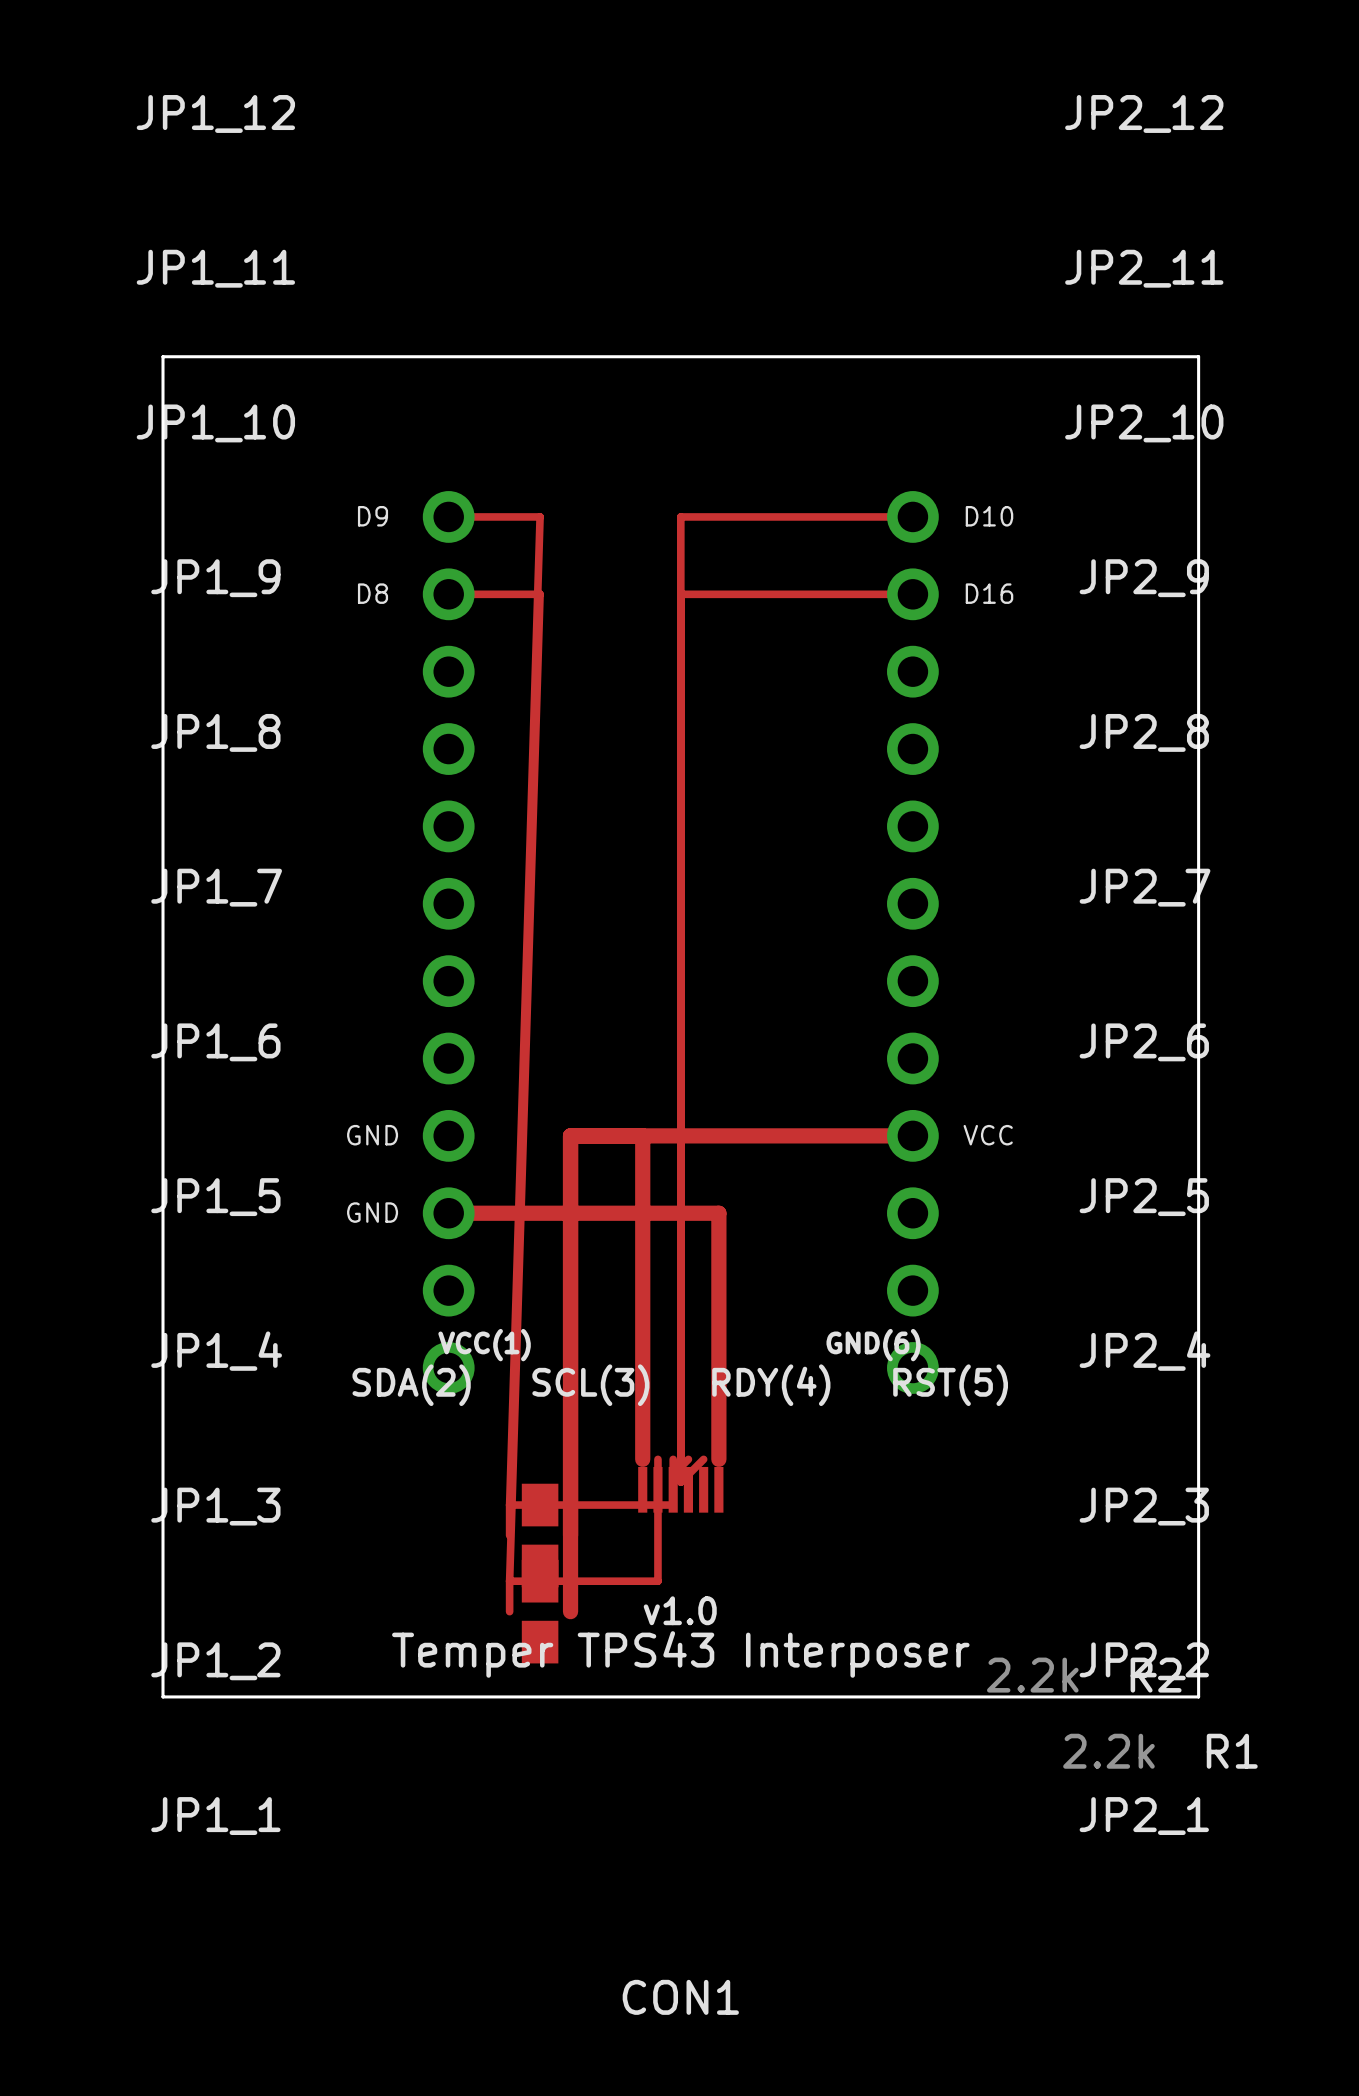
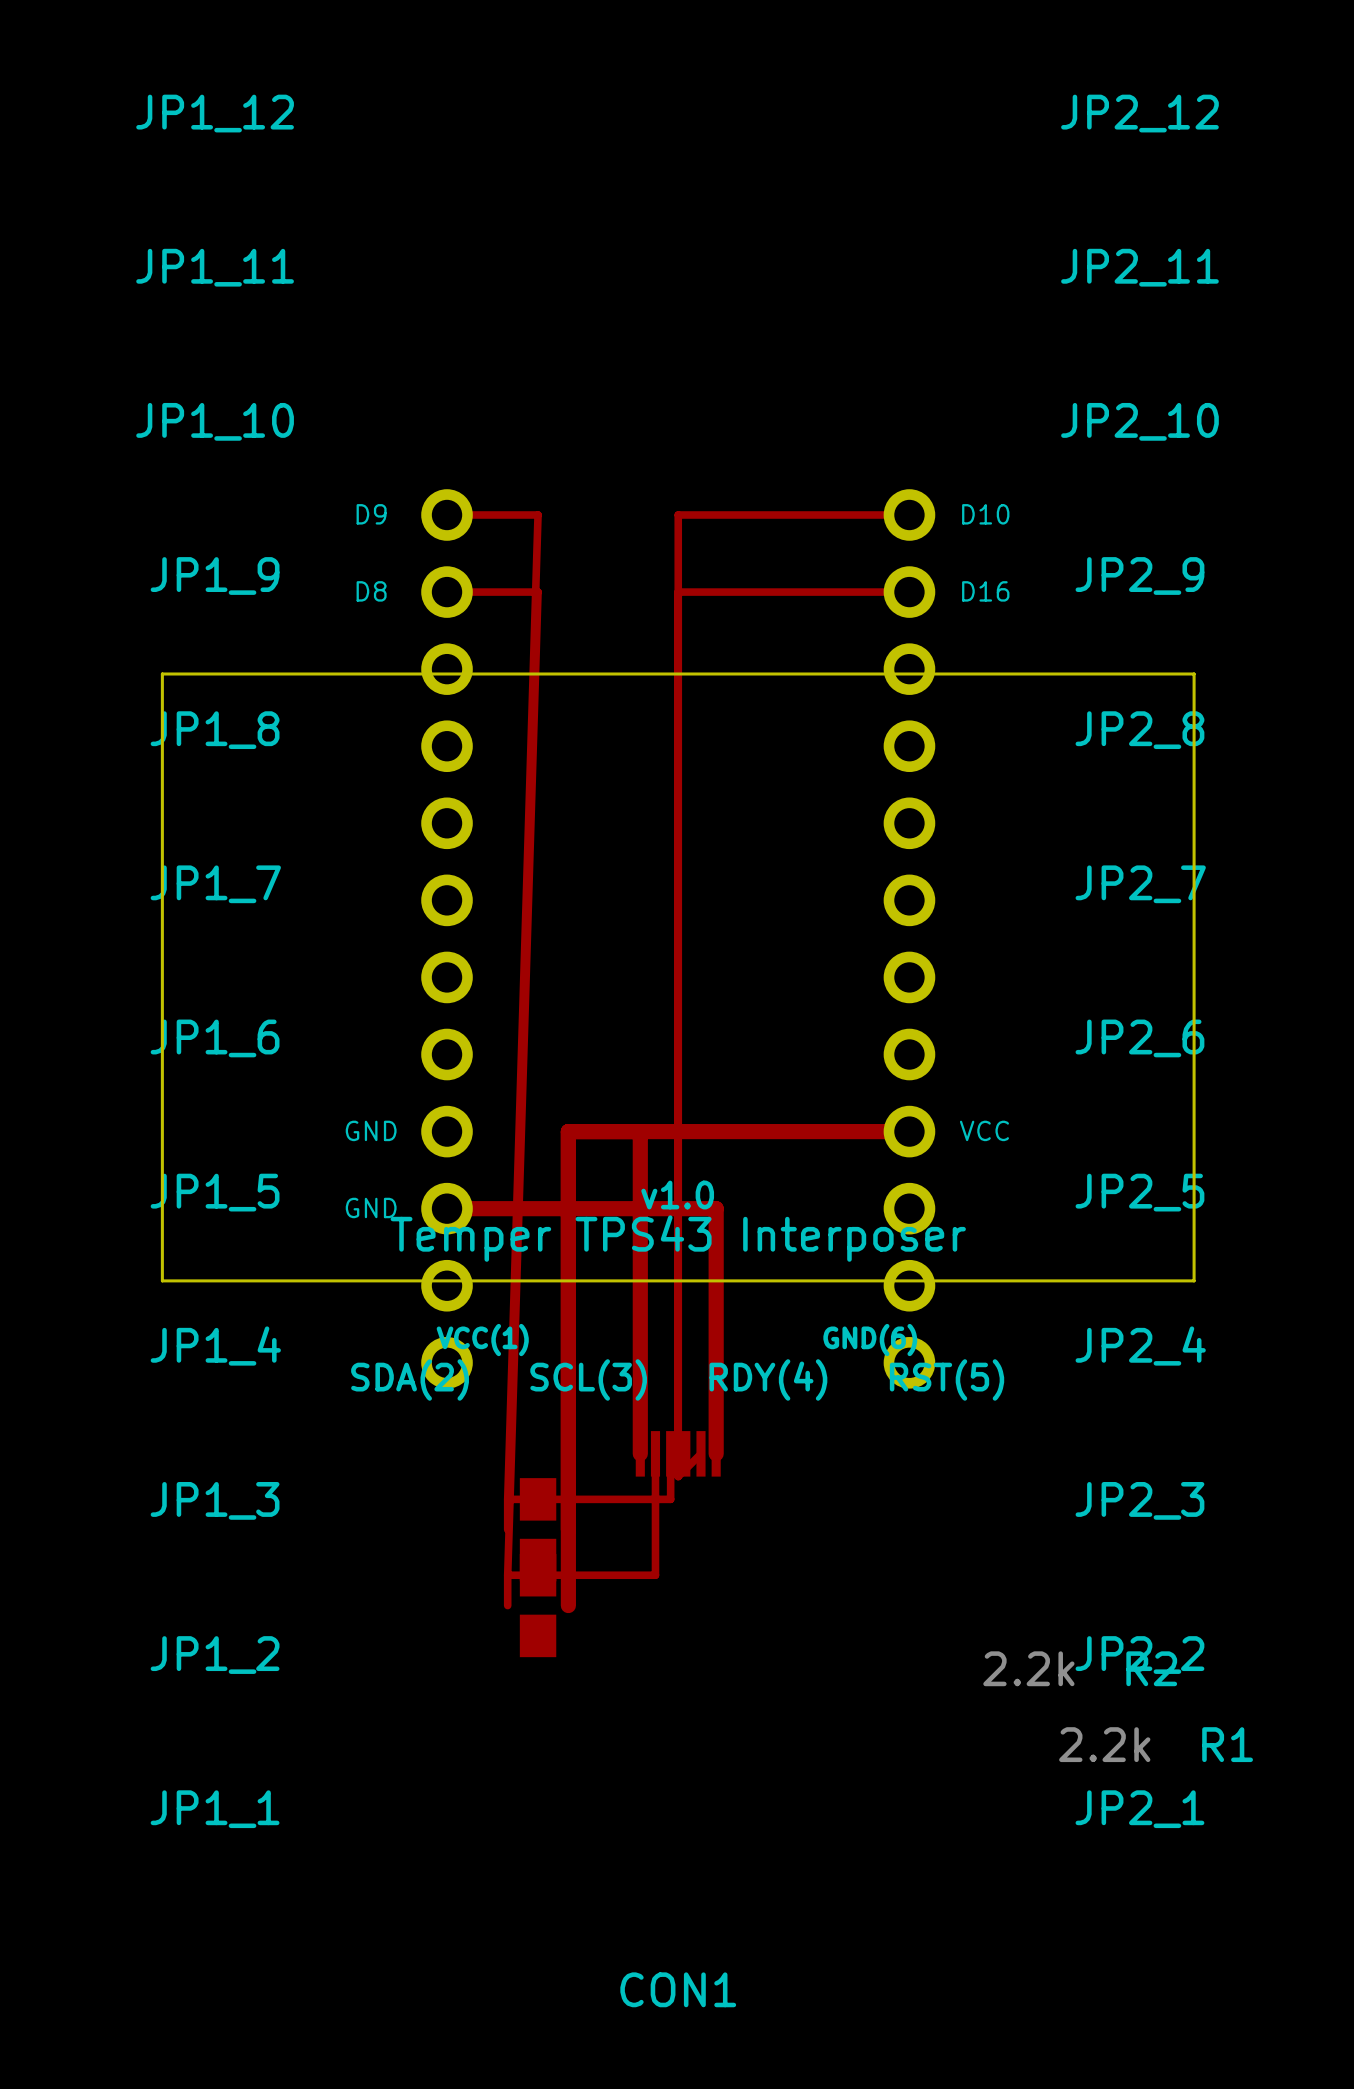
board edge: (163, 676) (163, 356) (1198, 356) (1198, 676) -> (162, 674) (1194, 674)
board edge: (163, 1285) (163, 1696) (1198, 1696) (1198, 1285) -> (162, 1280) (1194, 1280)
CON1 position: (680, 1489) -> (678, 1453)
text position: v1.0 (680, 1610) -> v1.0 (677, 1195)
text position: Temper TPS43 Interposer (680, 1654) -> Temper TPS43 Interposer (678, 1238)

